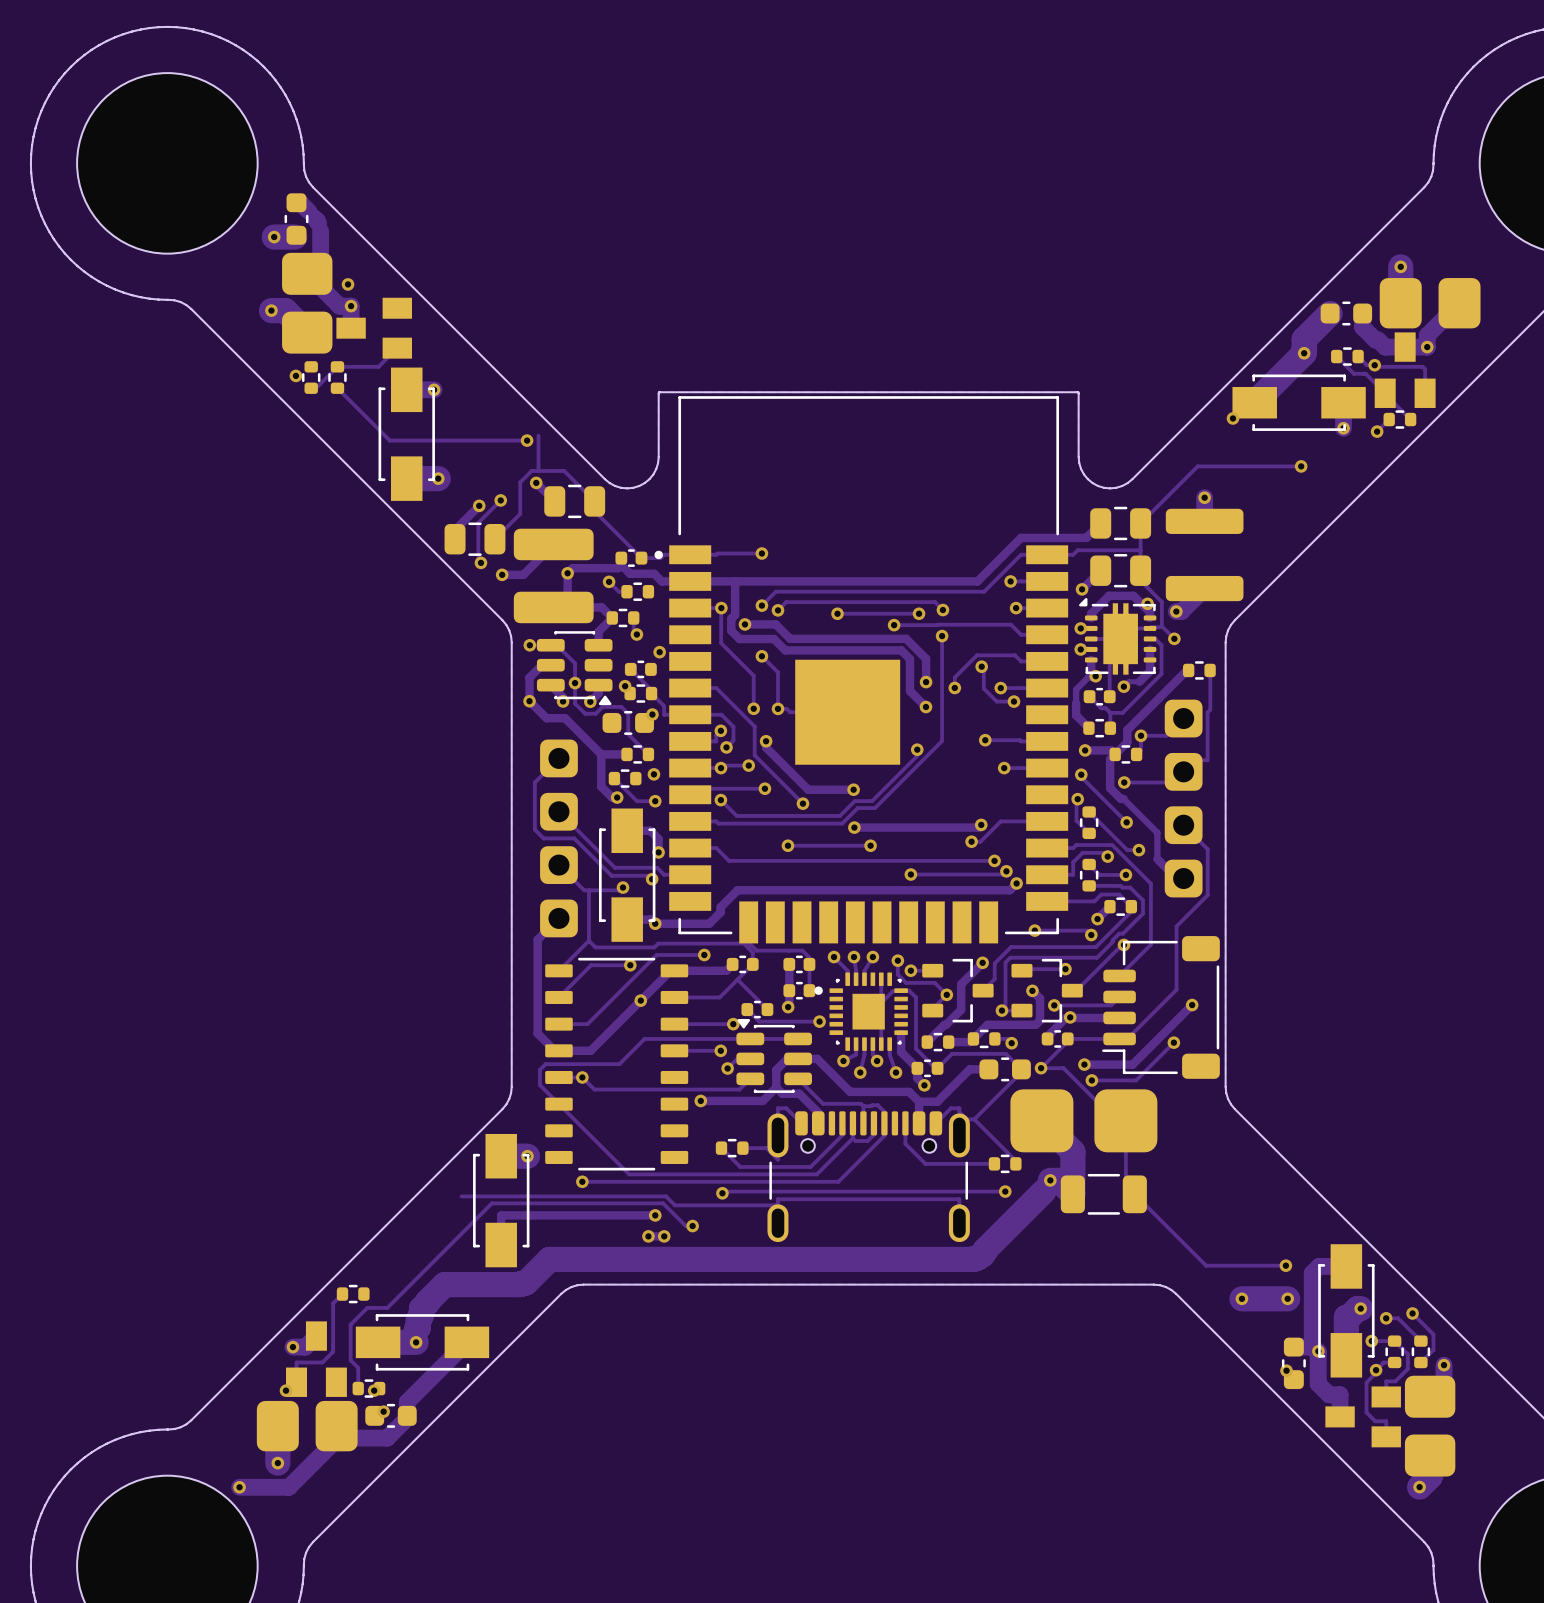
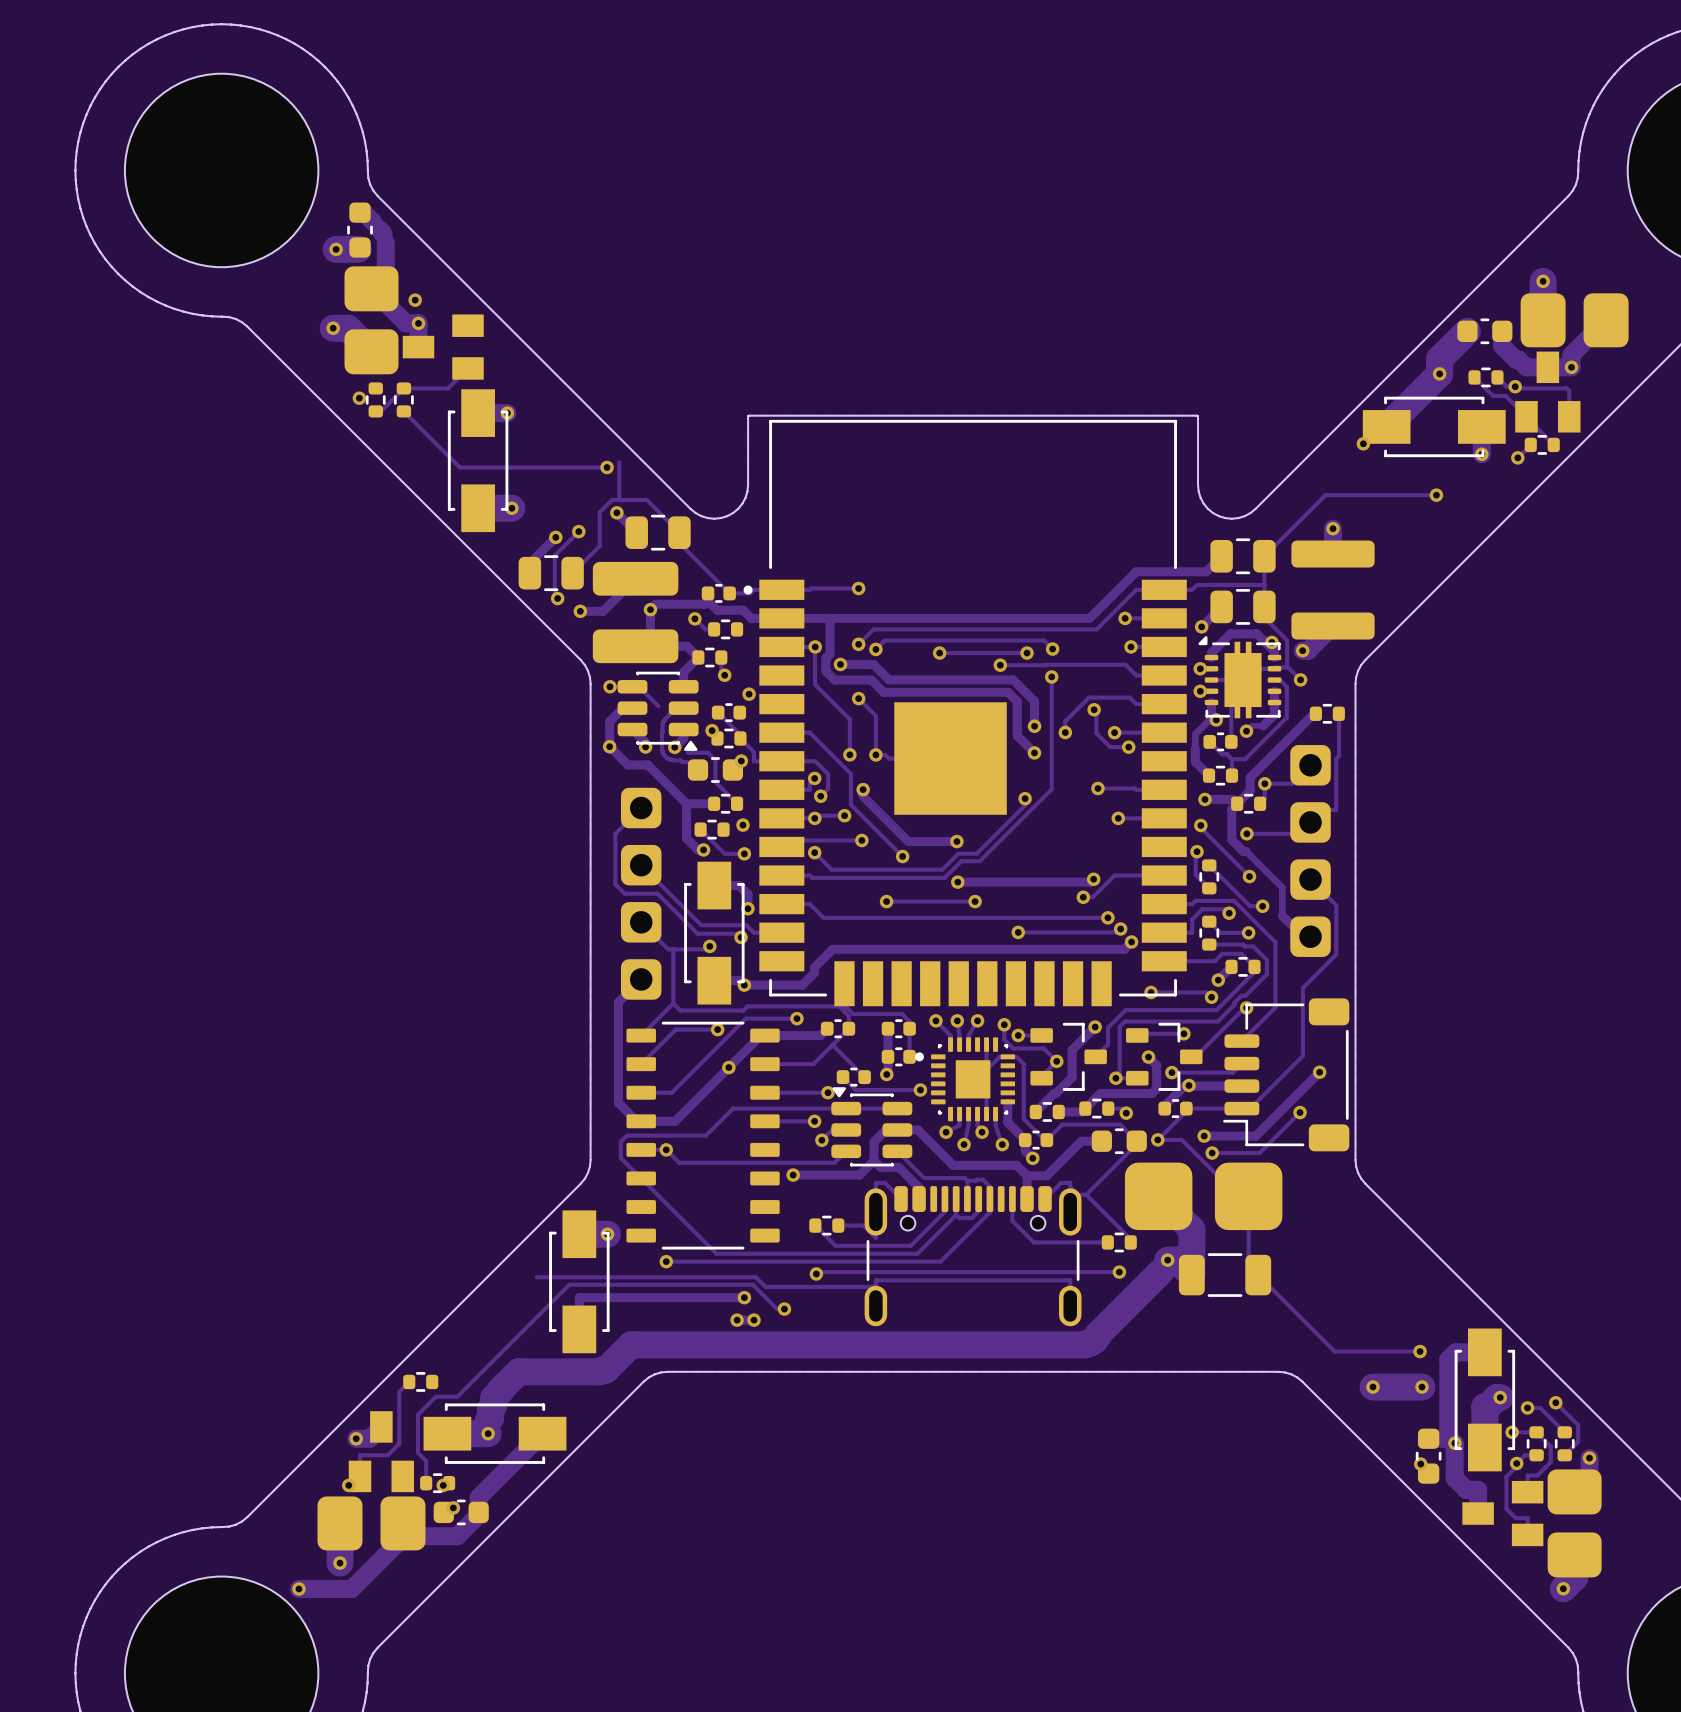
track: (575, 663) (575, 703) (585, 713) (595, 713) (602, 706) -> none
track: none -> (669, 713) (662, 723) (662, 752) (669, 759) (688, 762)
via: (575, 683) -> none

